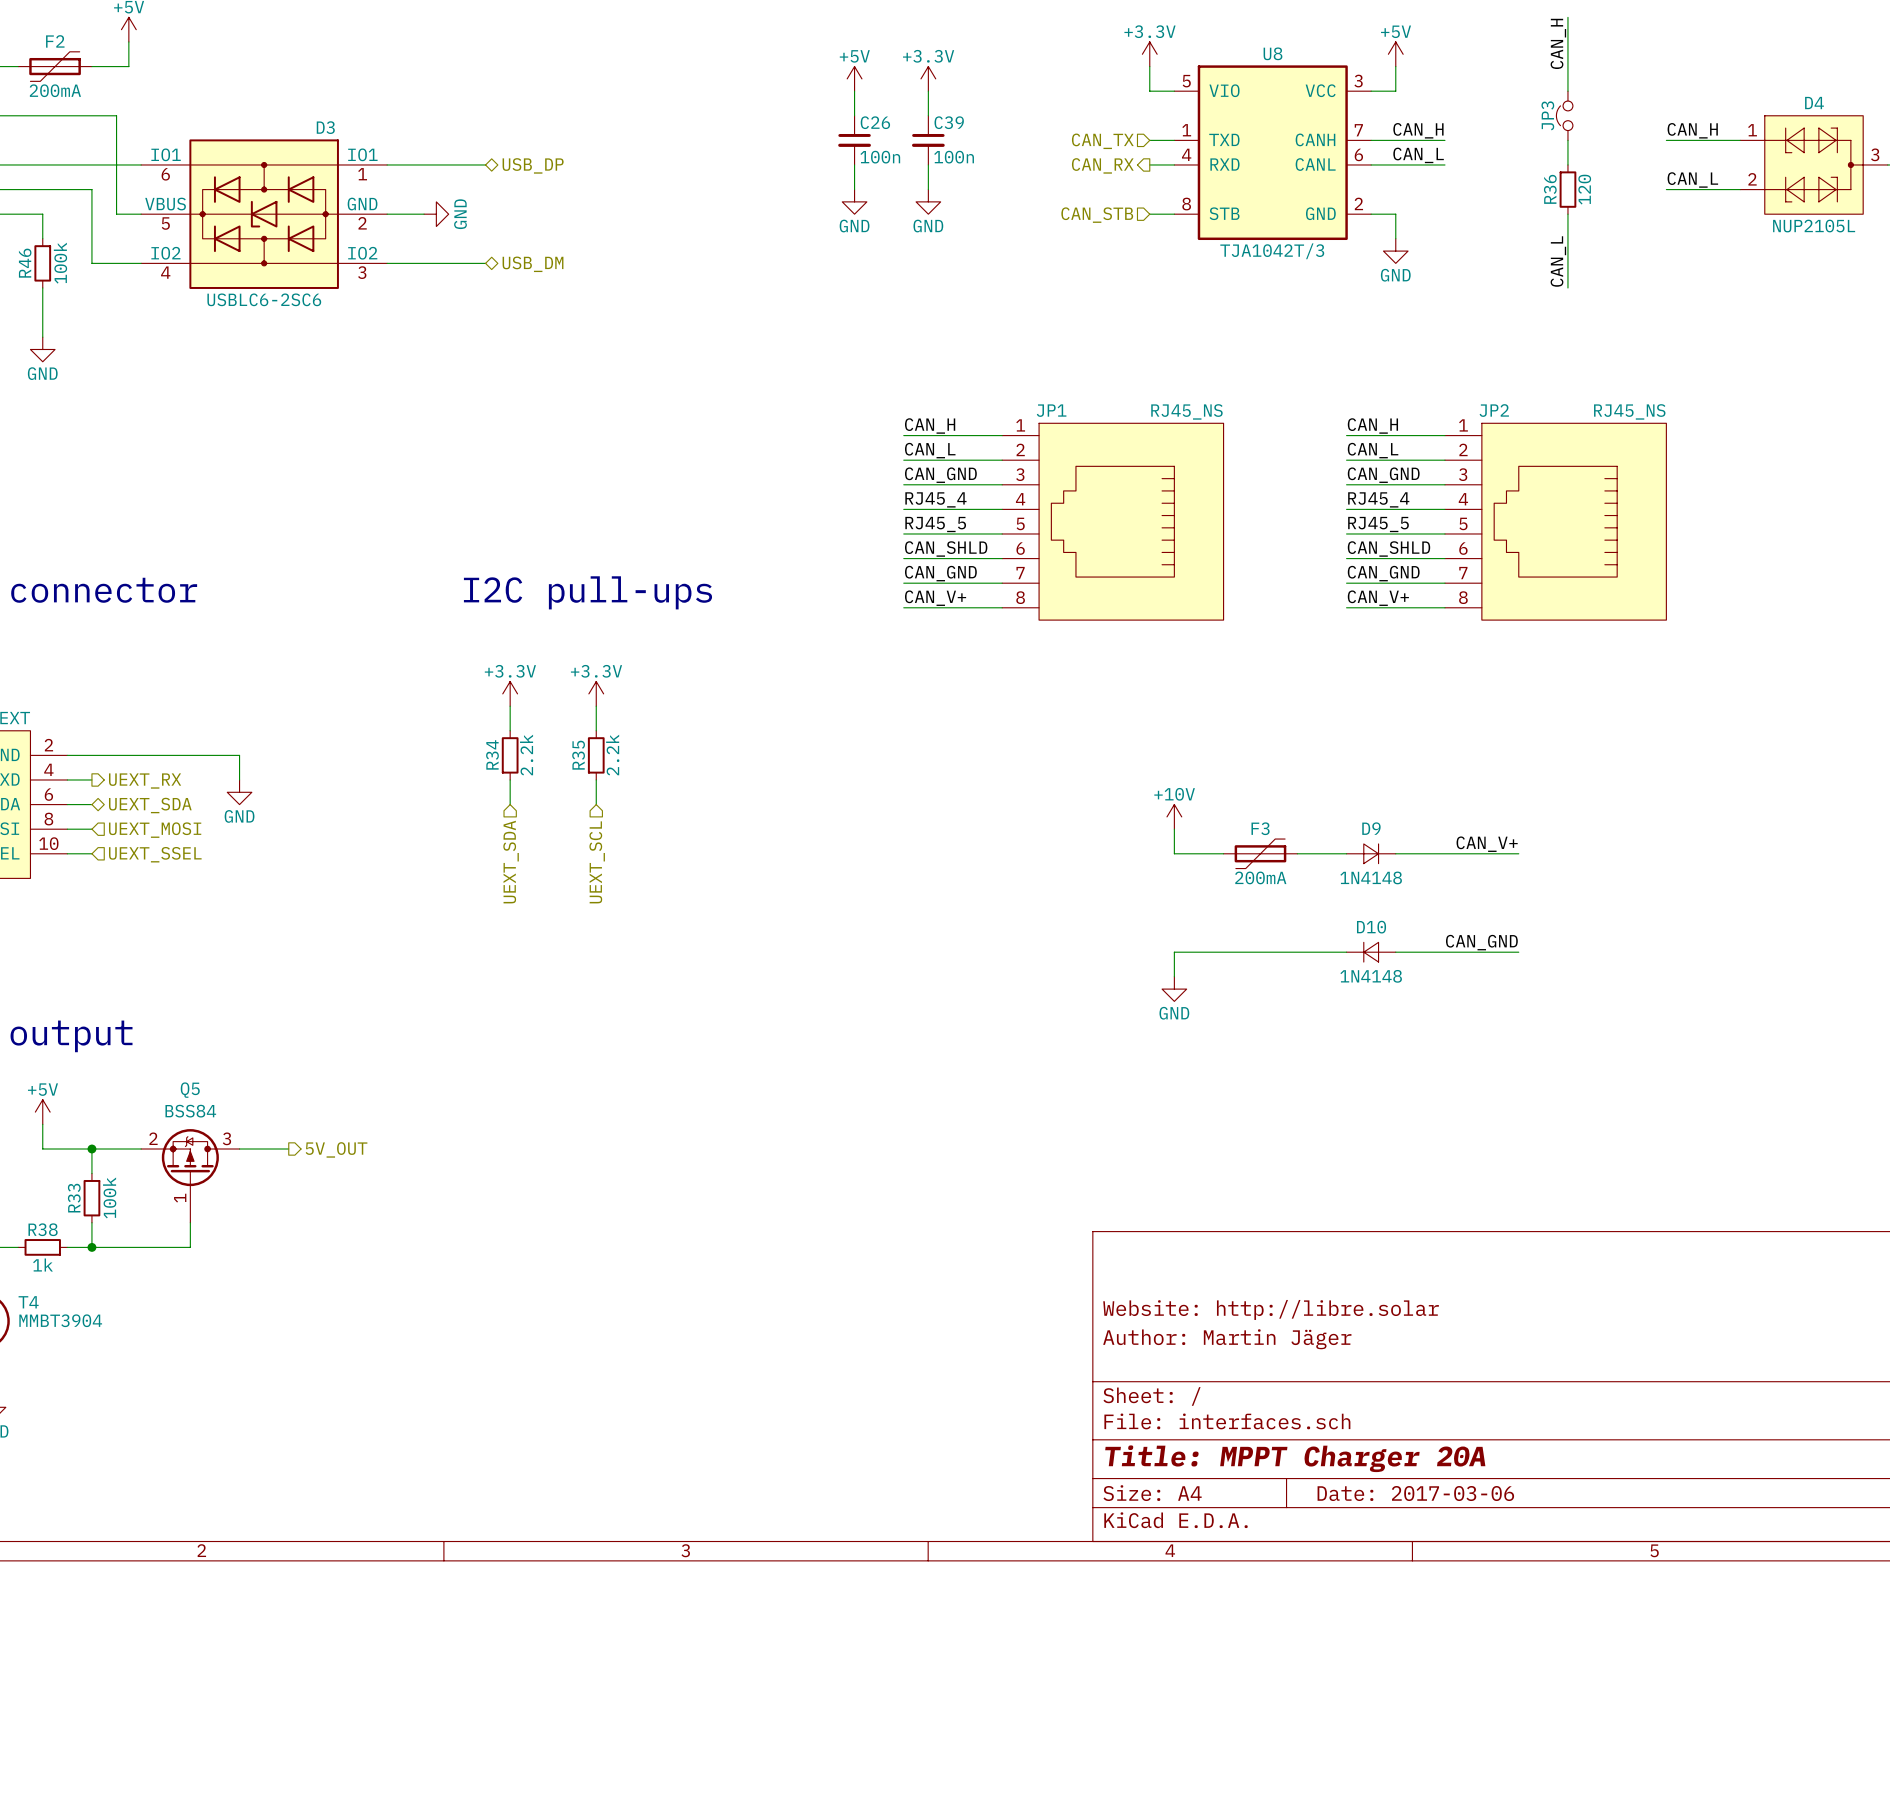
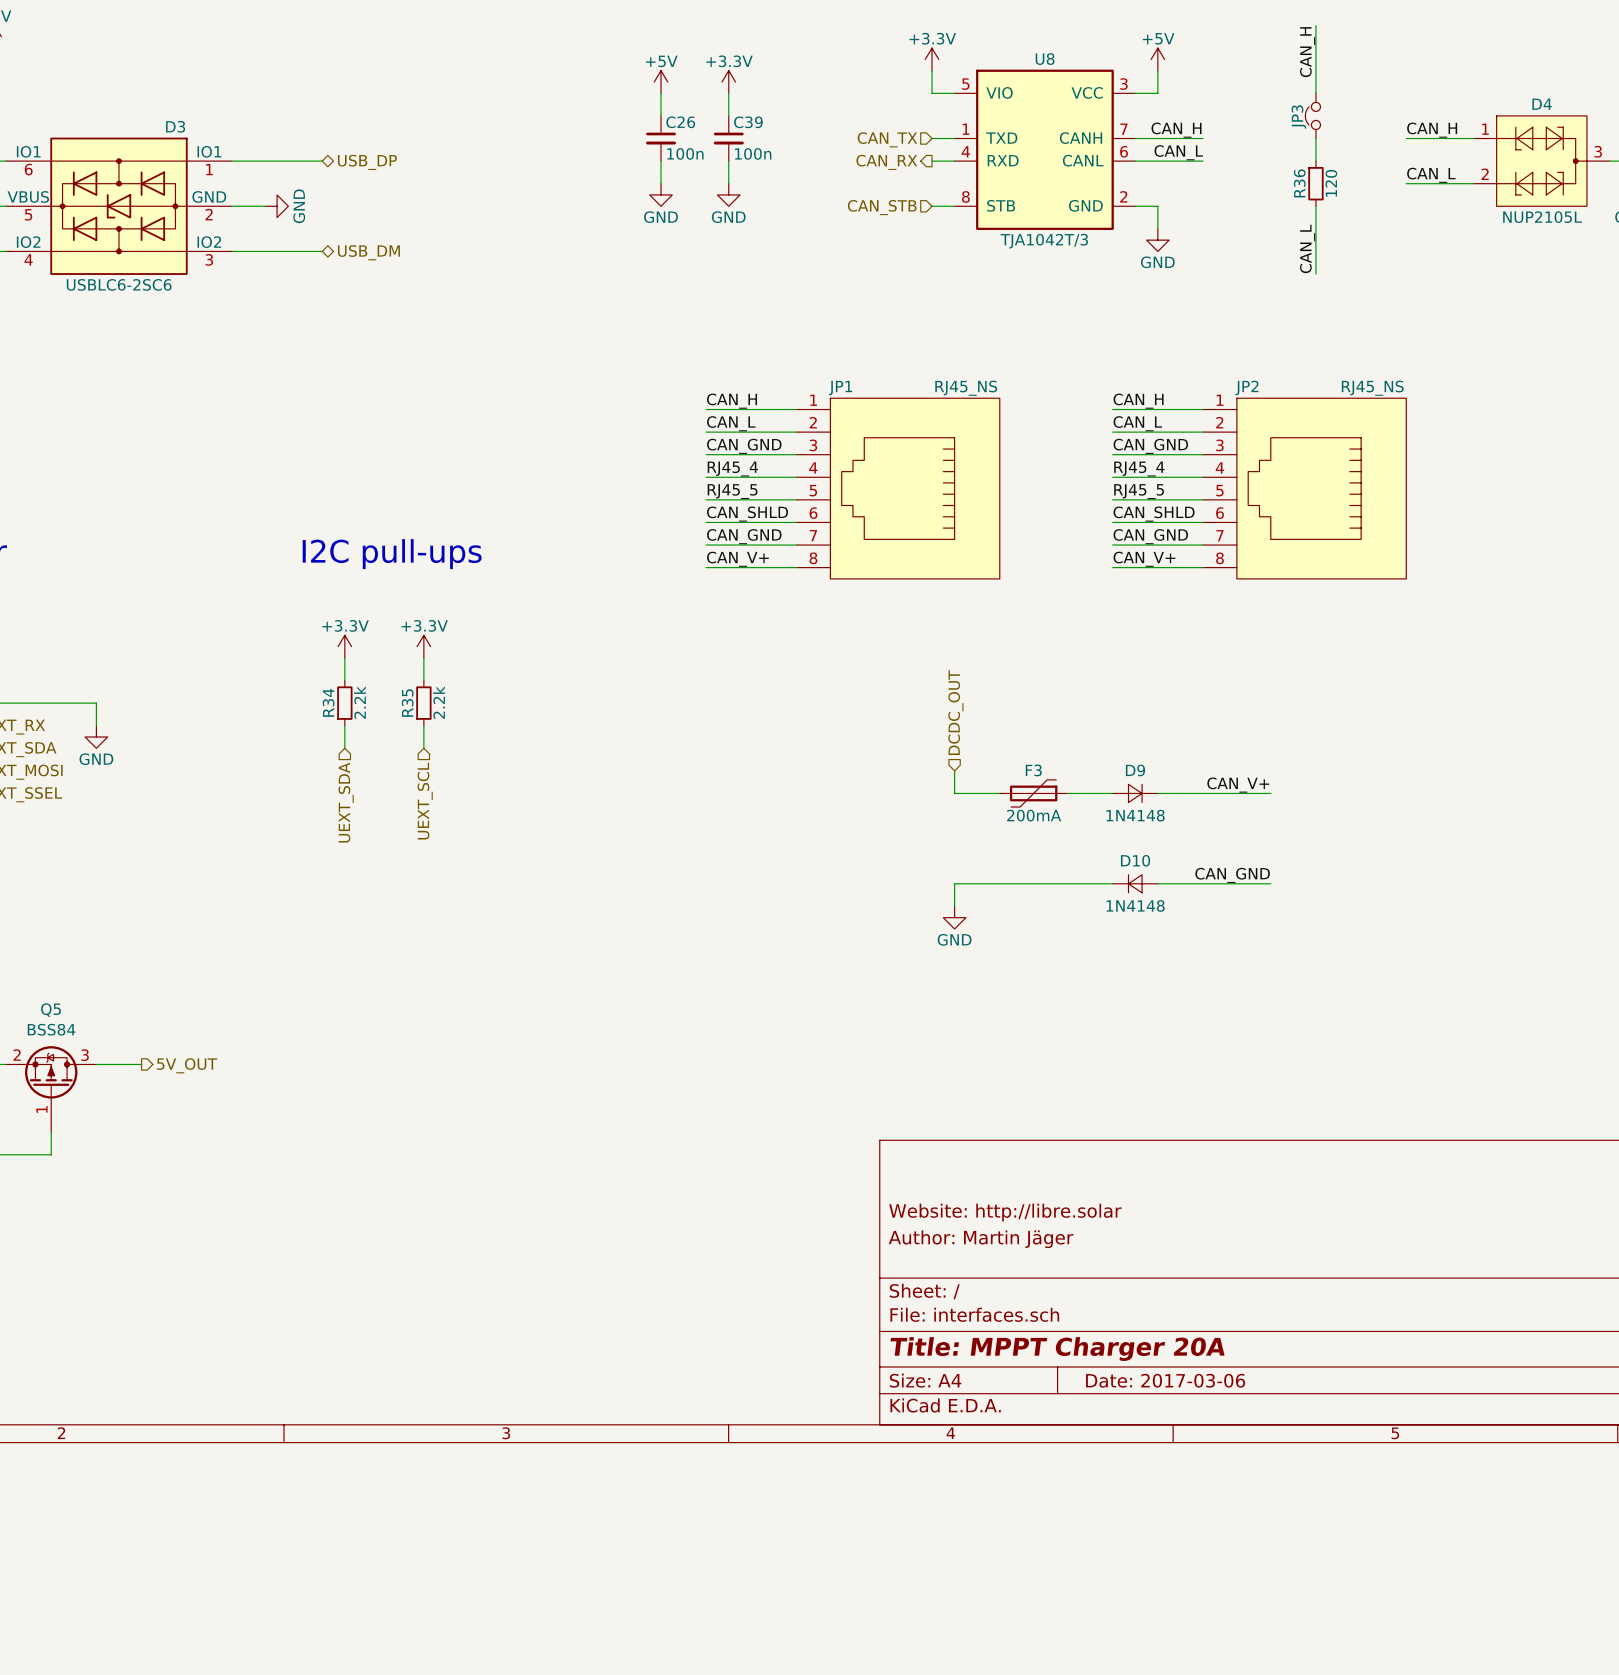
hierarchical label: none -> DCDC_OUT (955, 712)
power symbol: +10V (1174, 816) -> none

